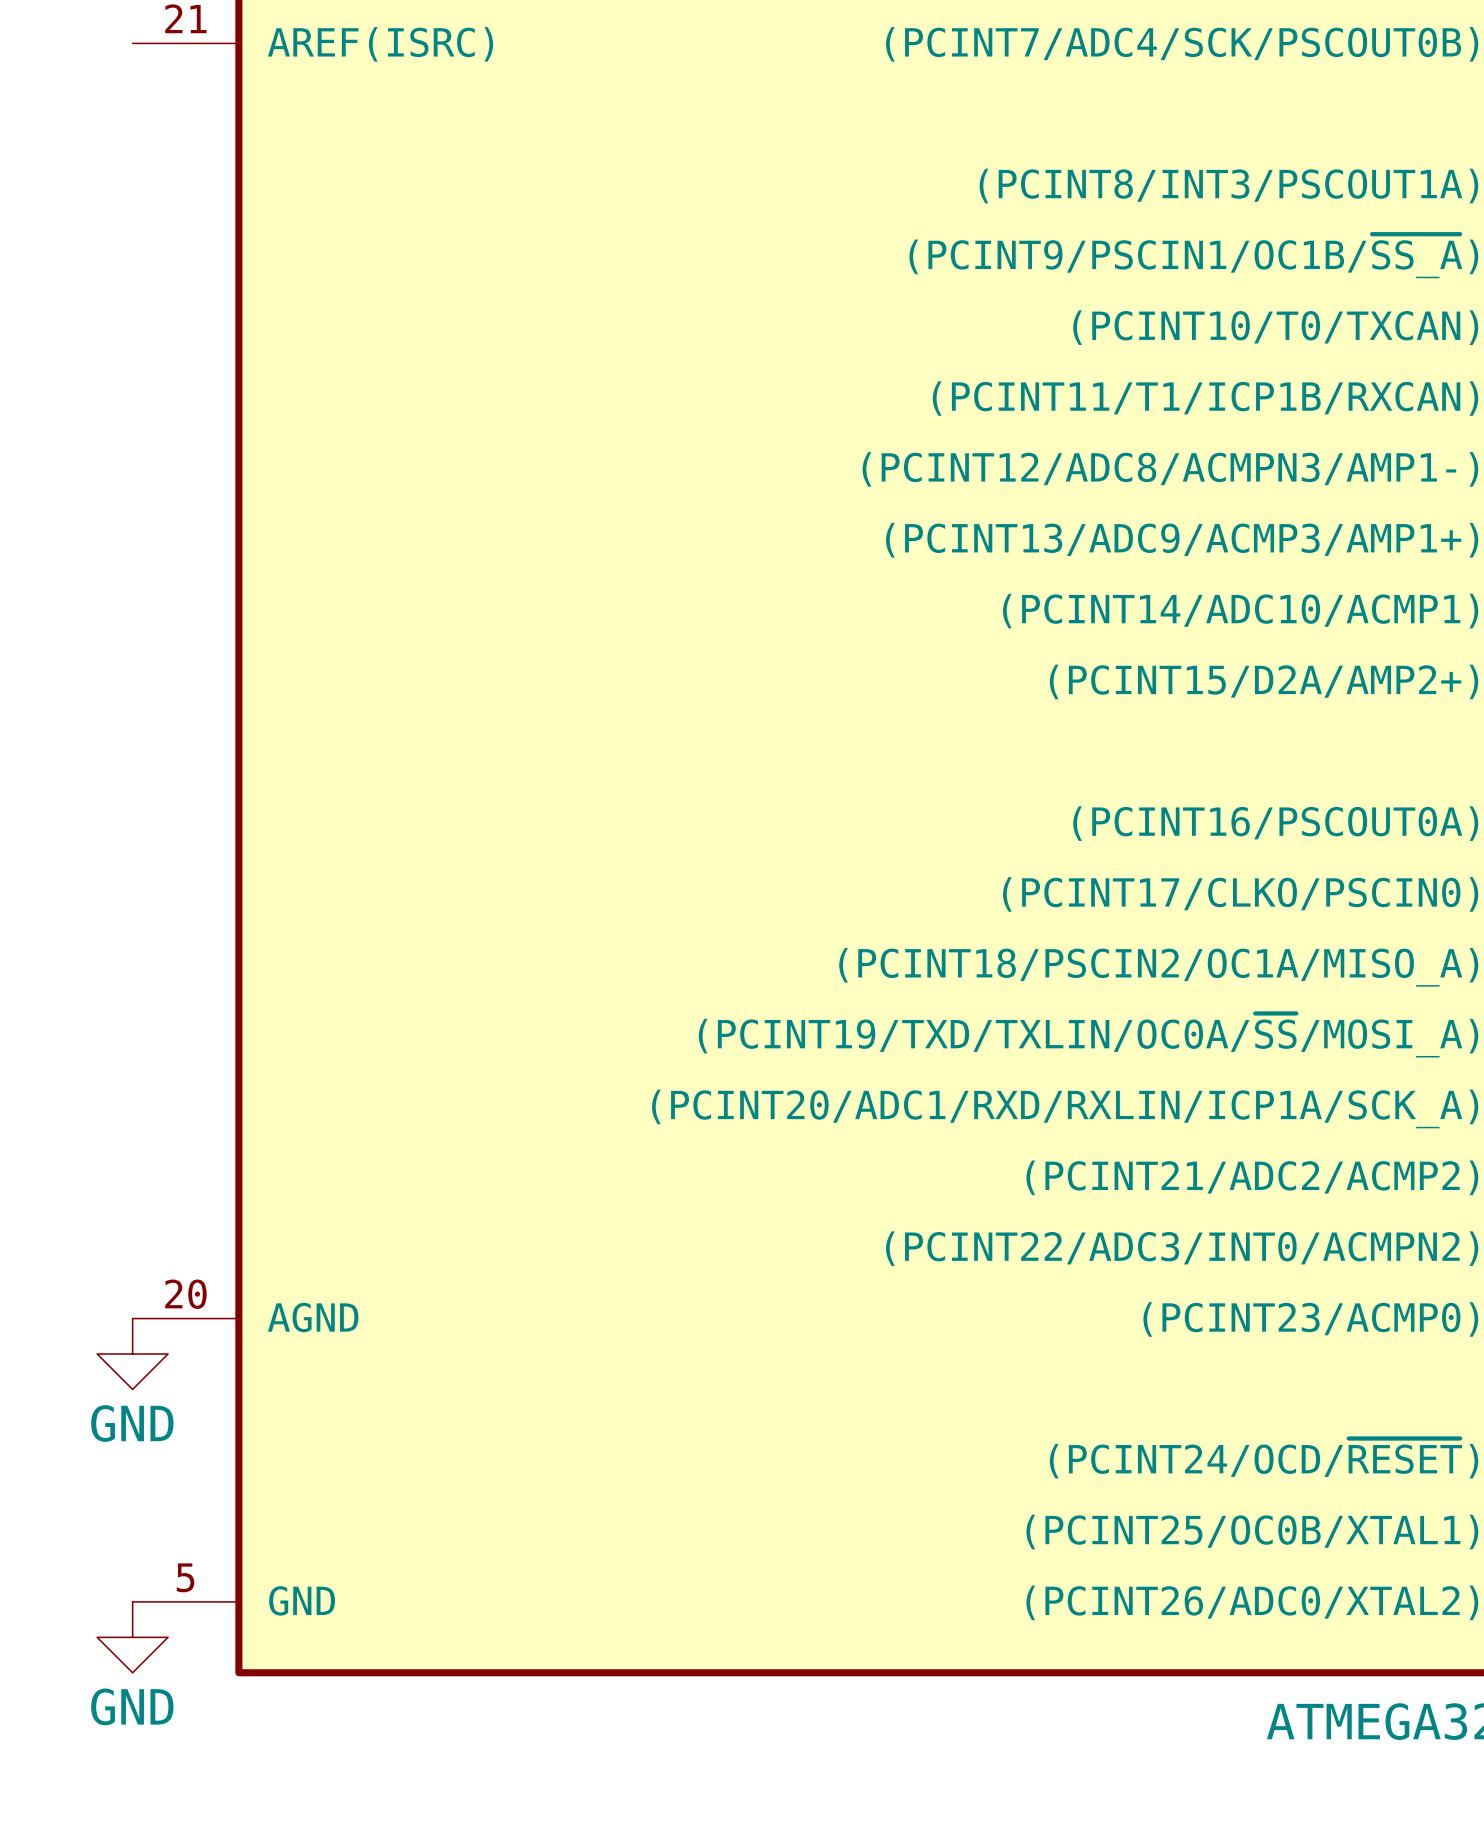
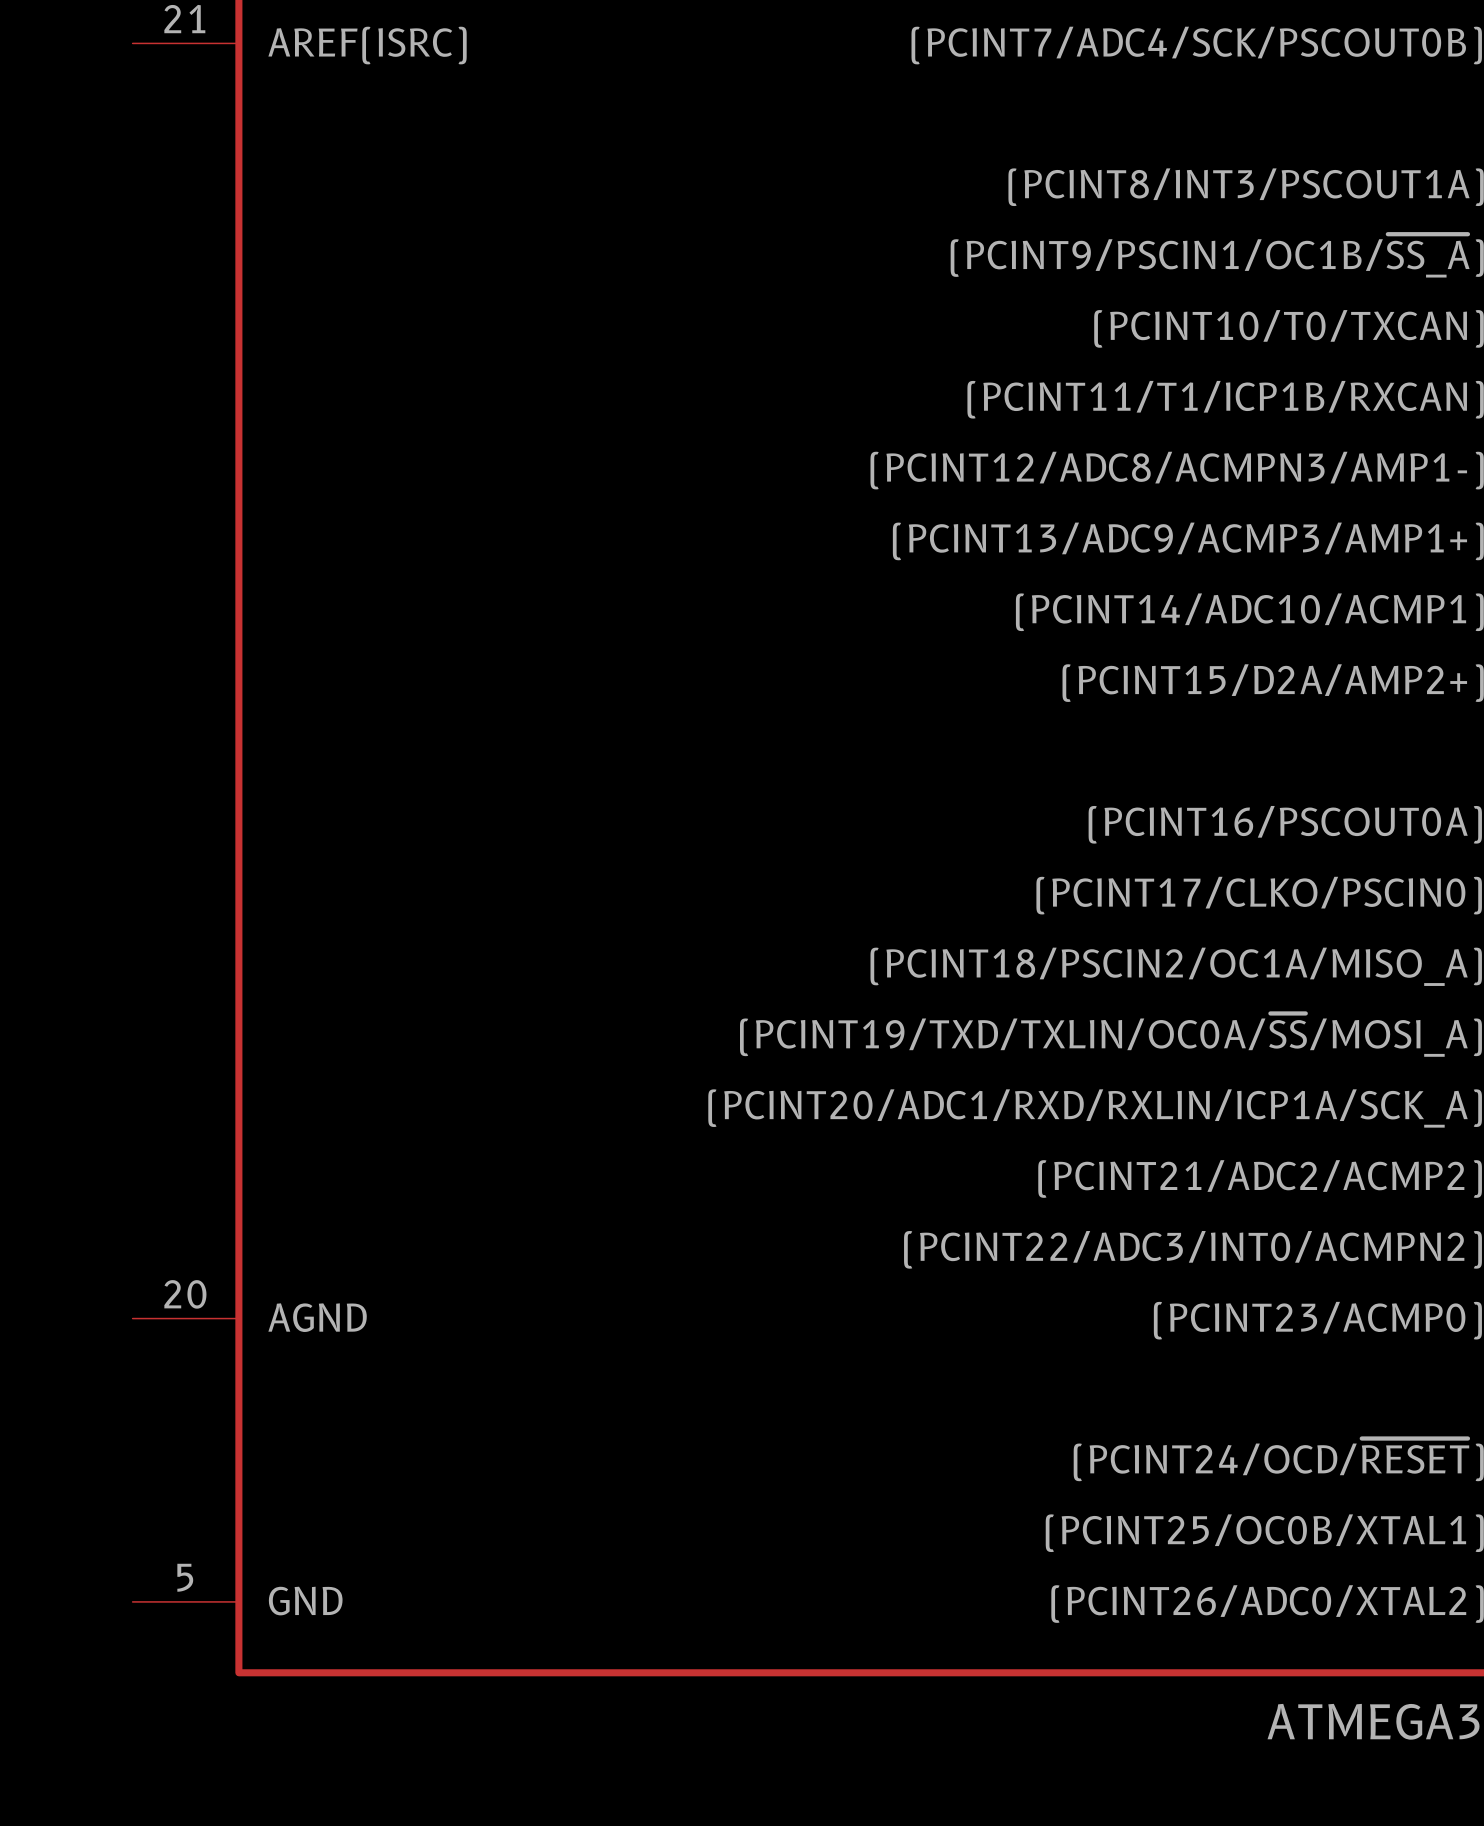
power symbol: GND (132, 1353) -> none
power symbol: GND (132, 1637) -> none

